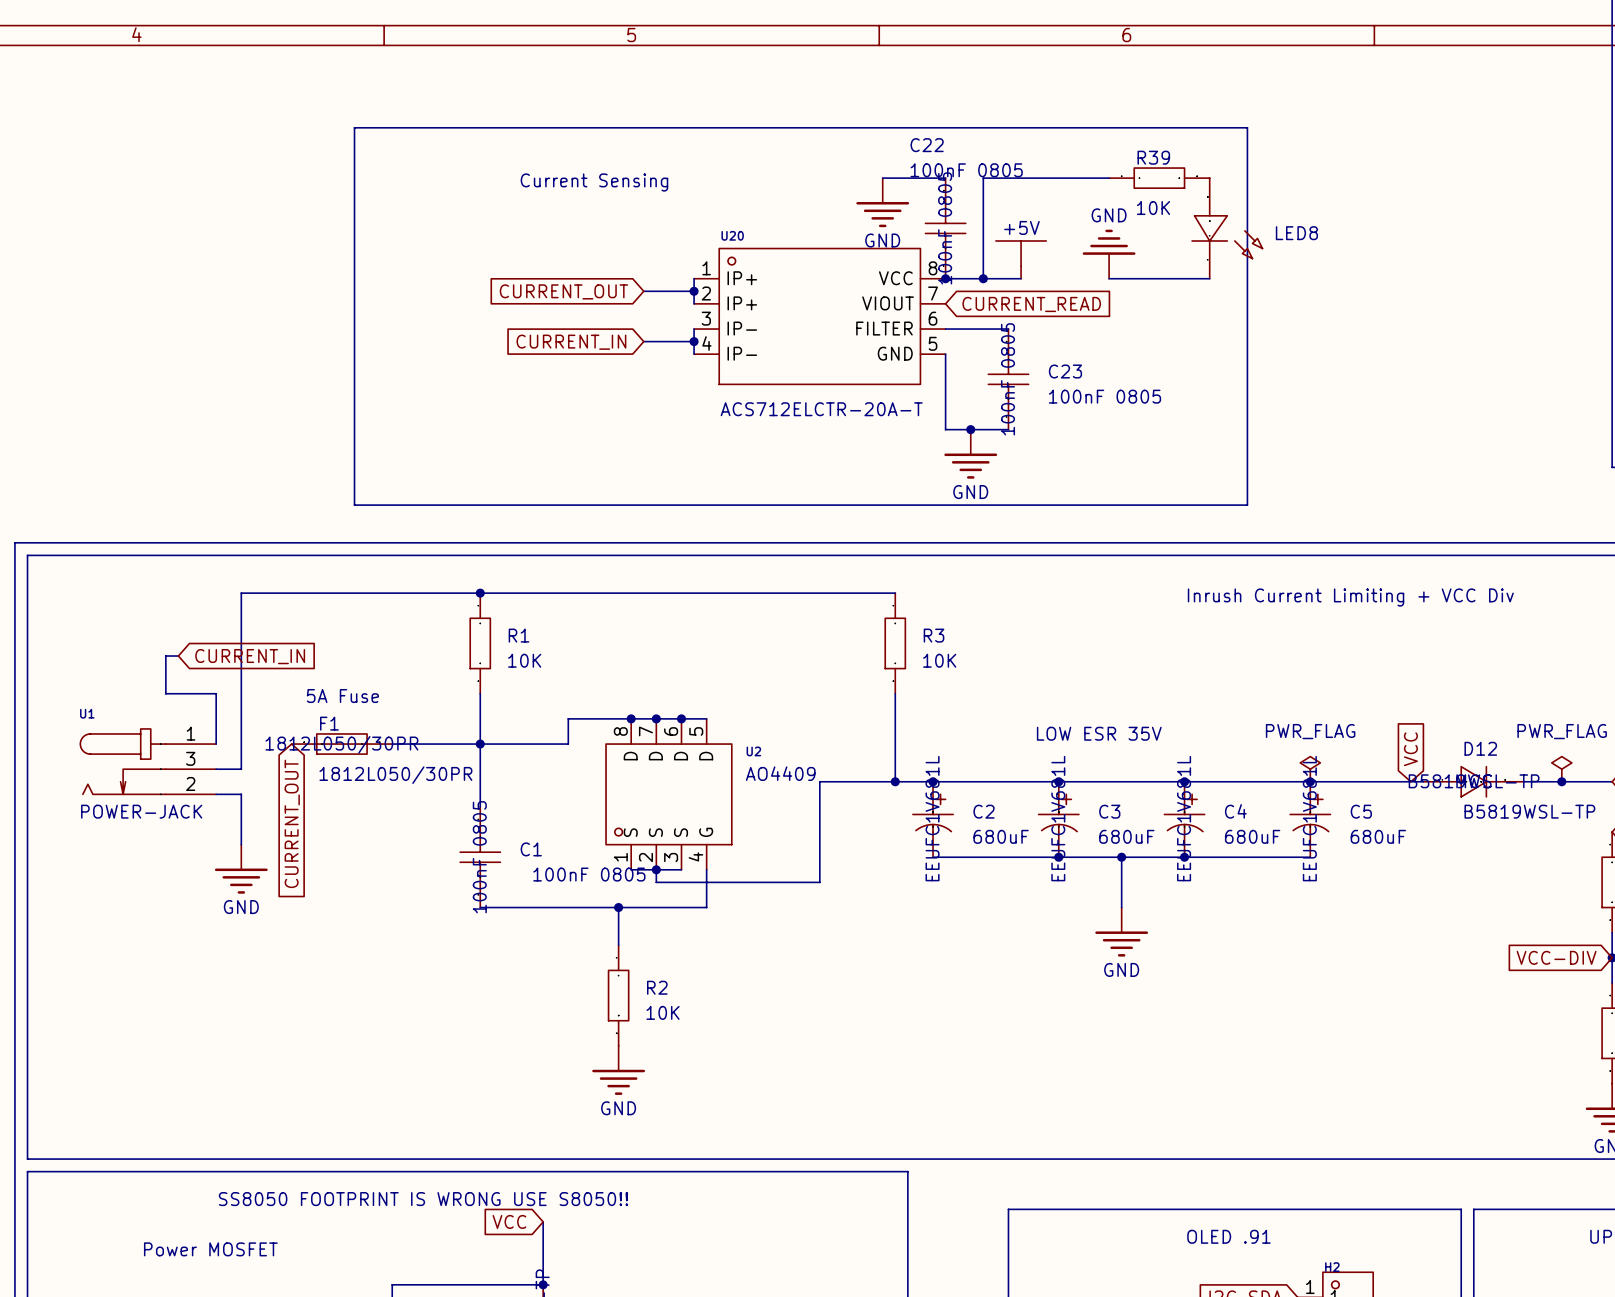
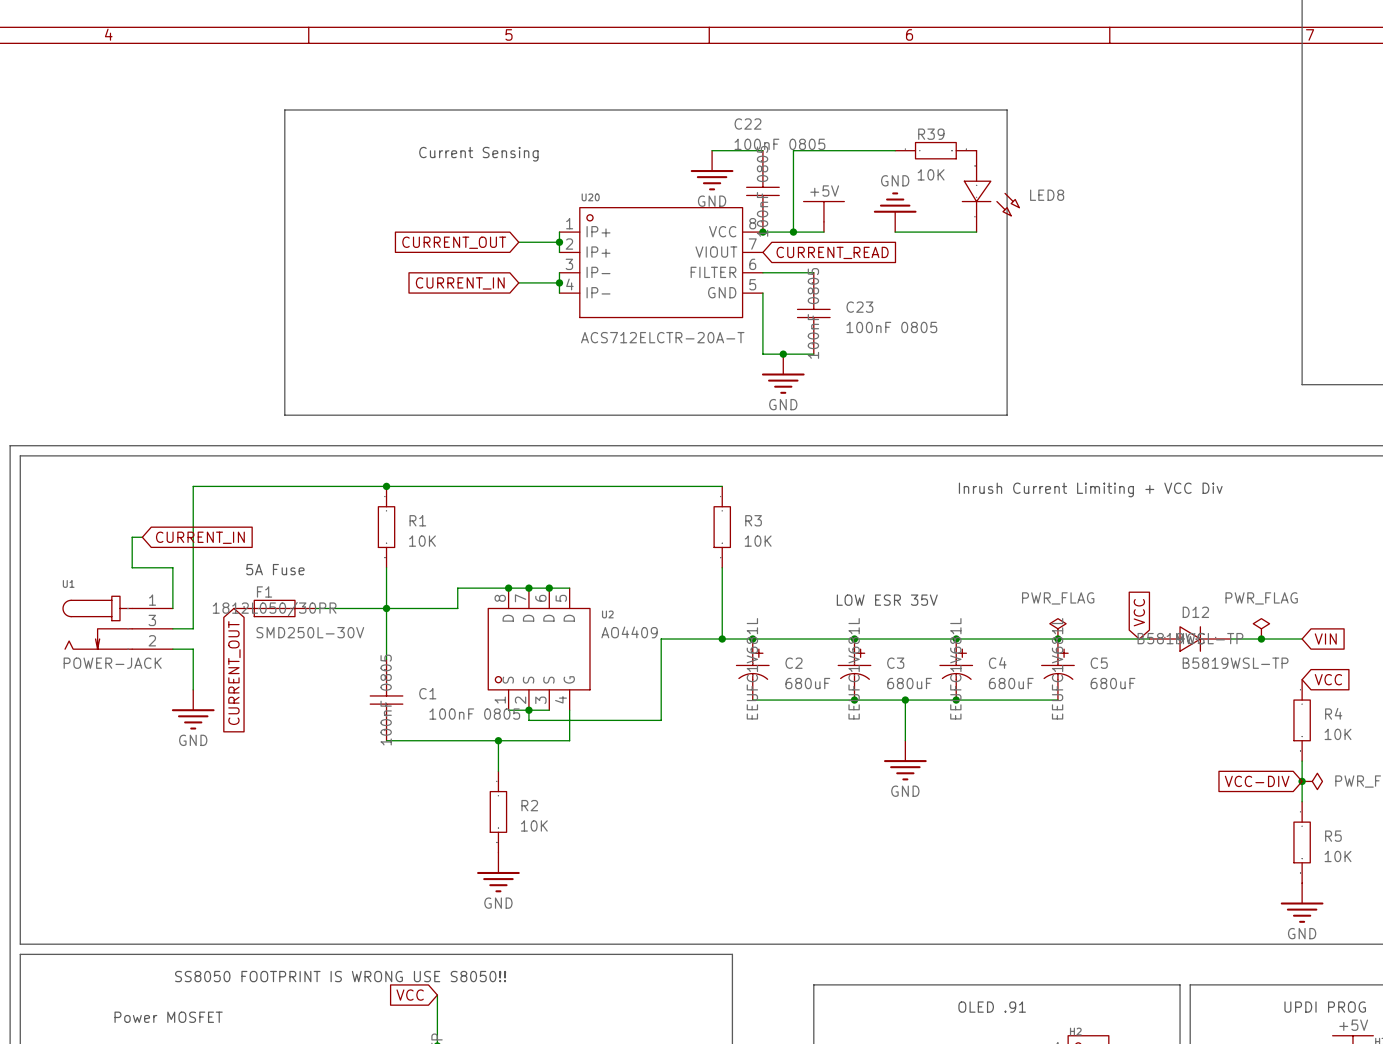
F1 value: 1812L050/30PR (395, 775) -> SMD250L-30V (310, 632)

